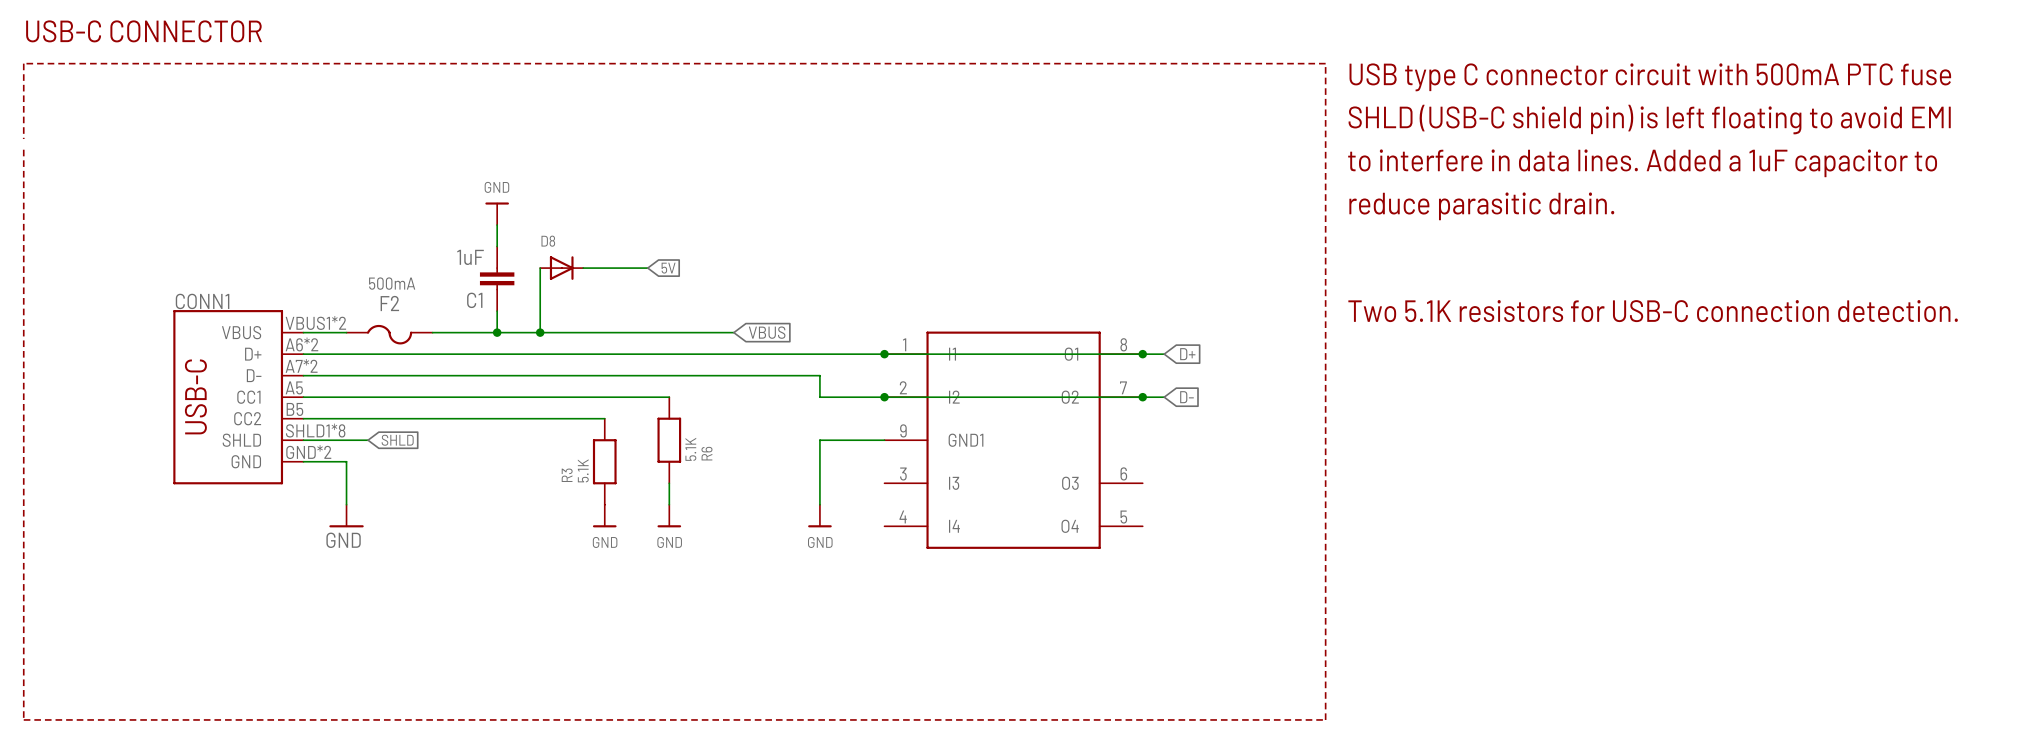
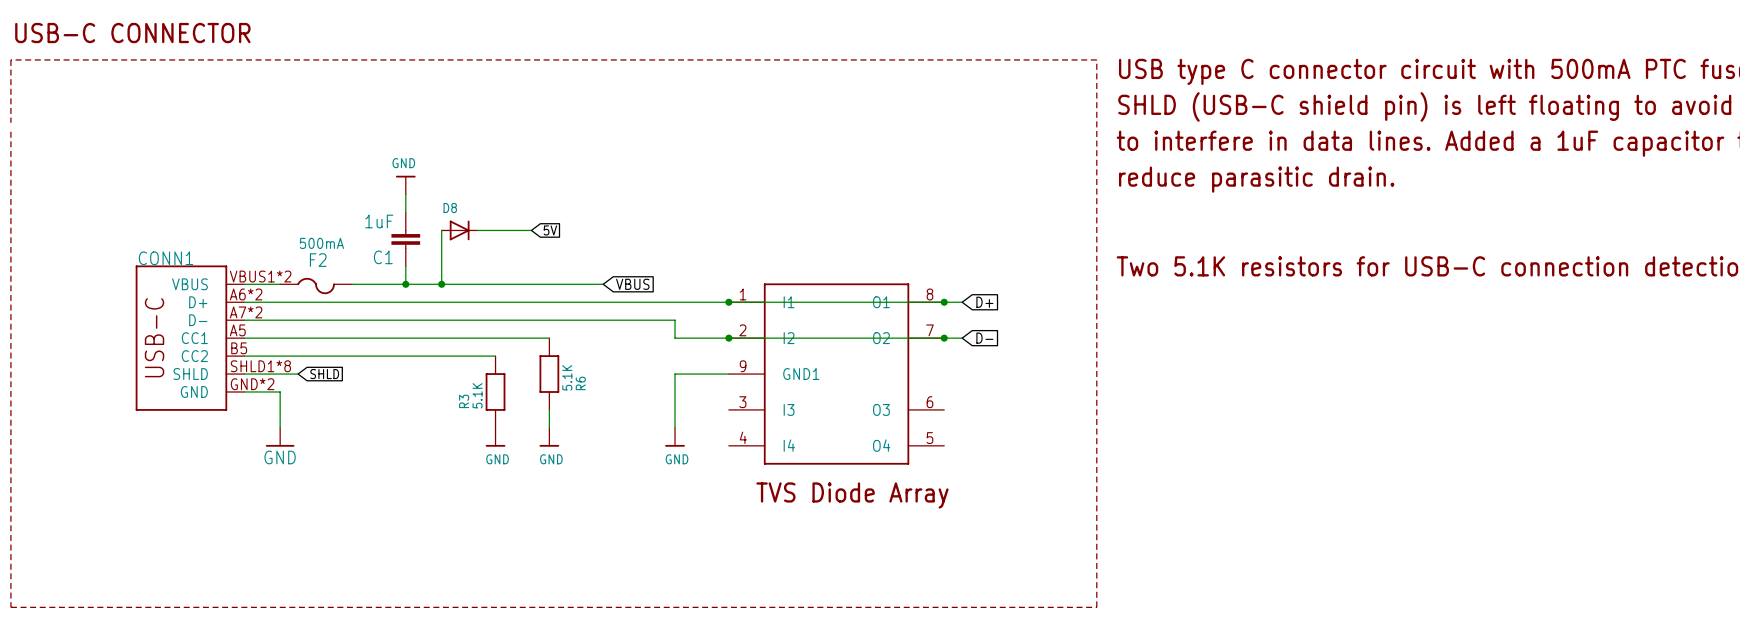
text: none -> TVS Diode Array (852, 495)

